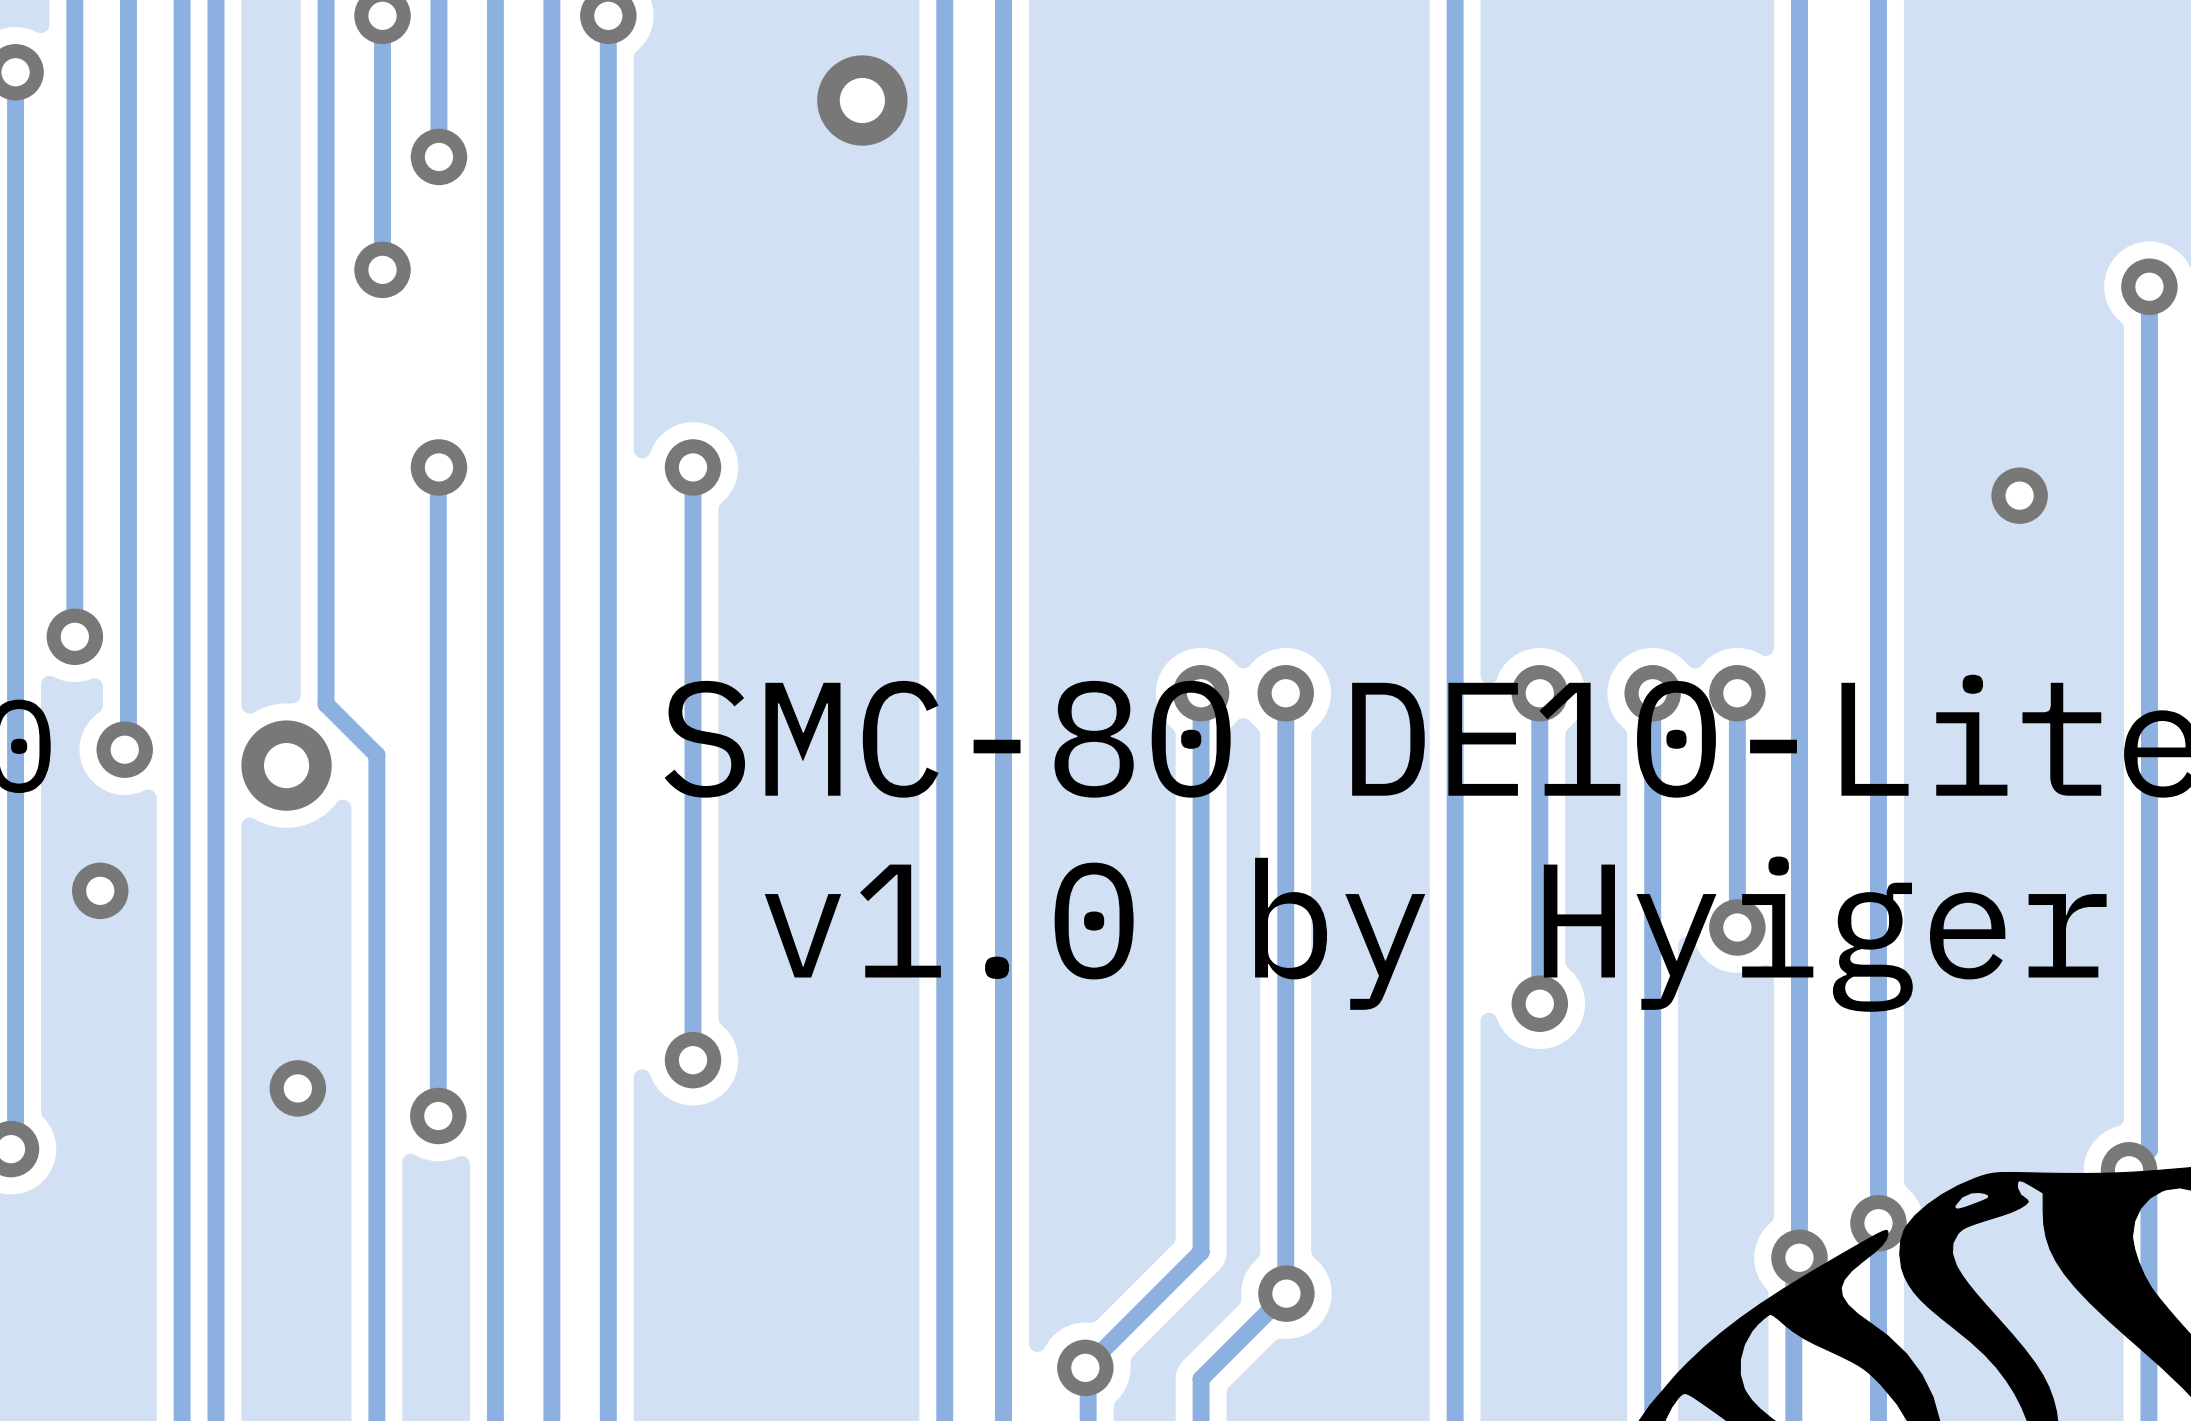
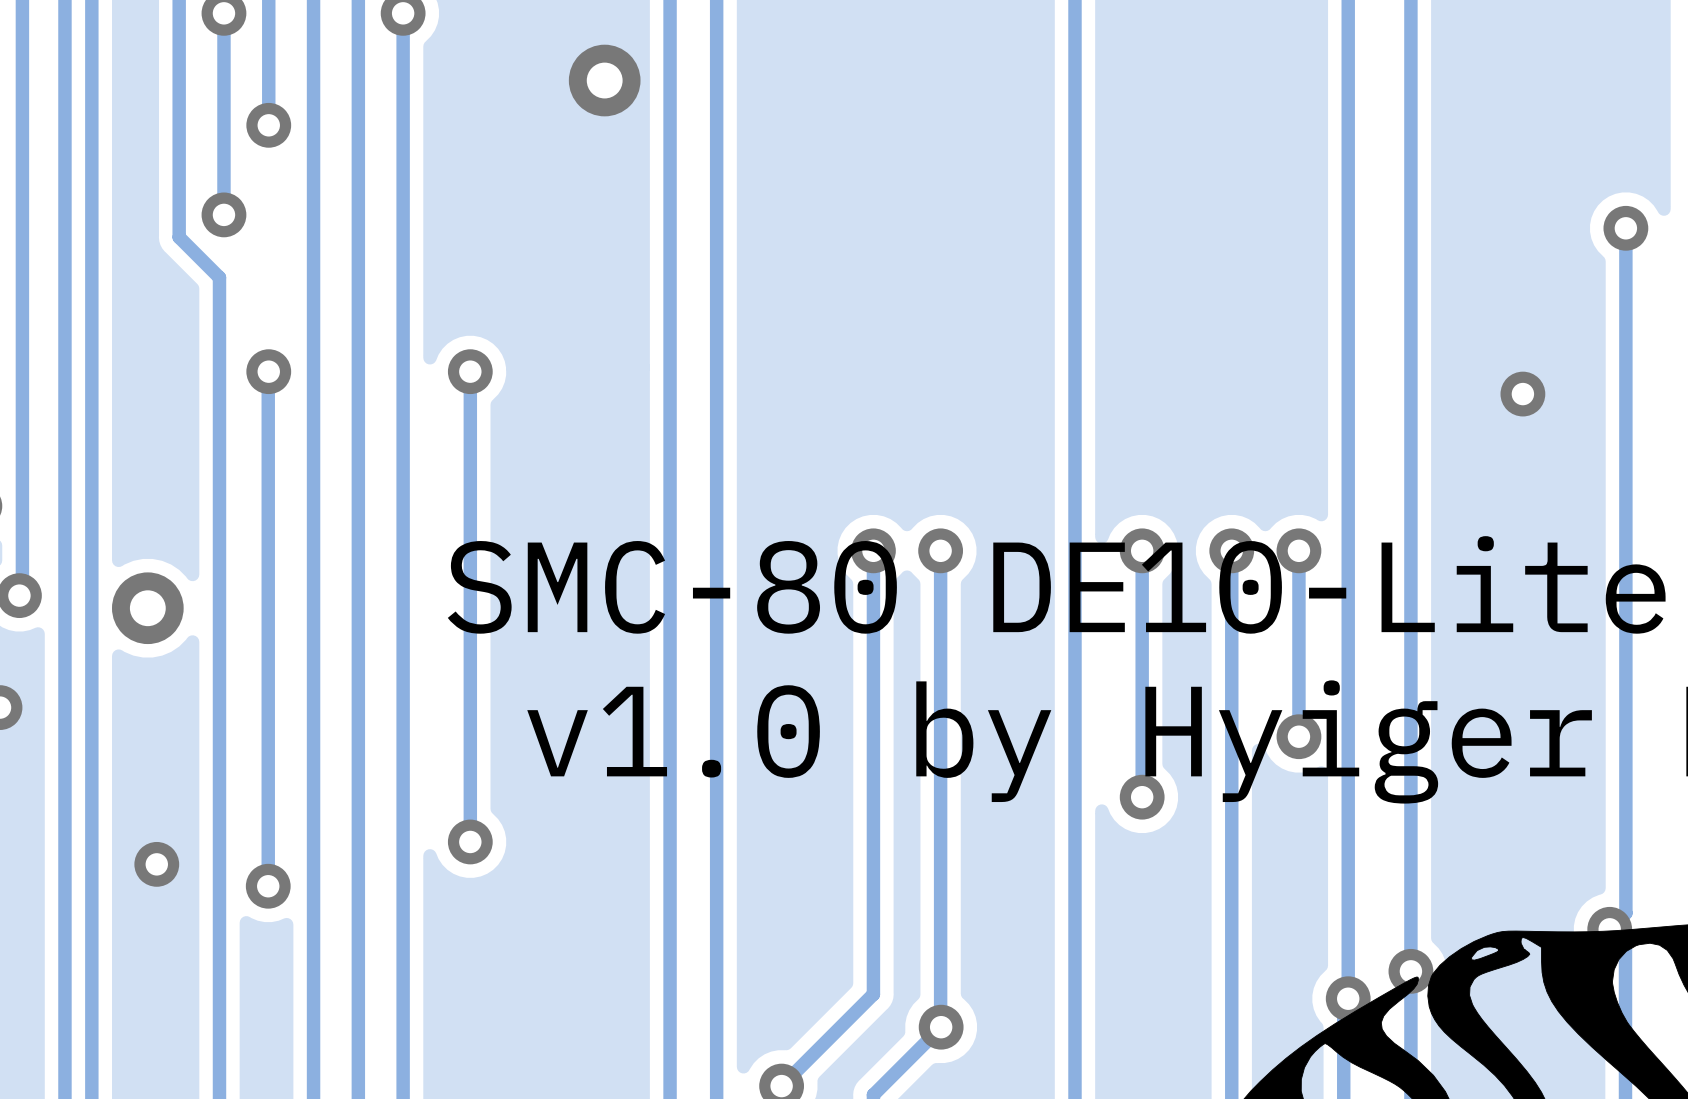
track: (326, 298) (326, 704) (376, 755) -> (179, 237) (219, 277) (219, 599)

